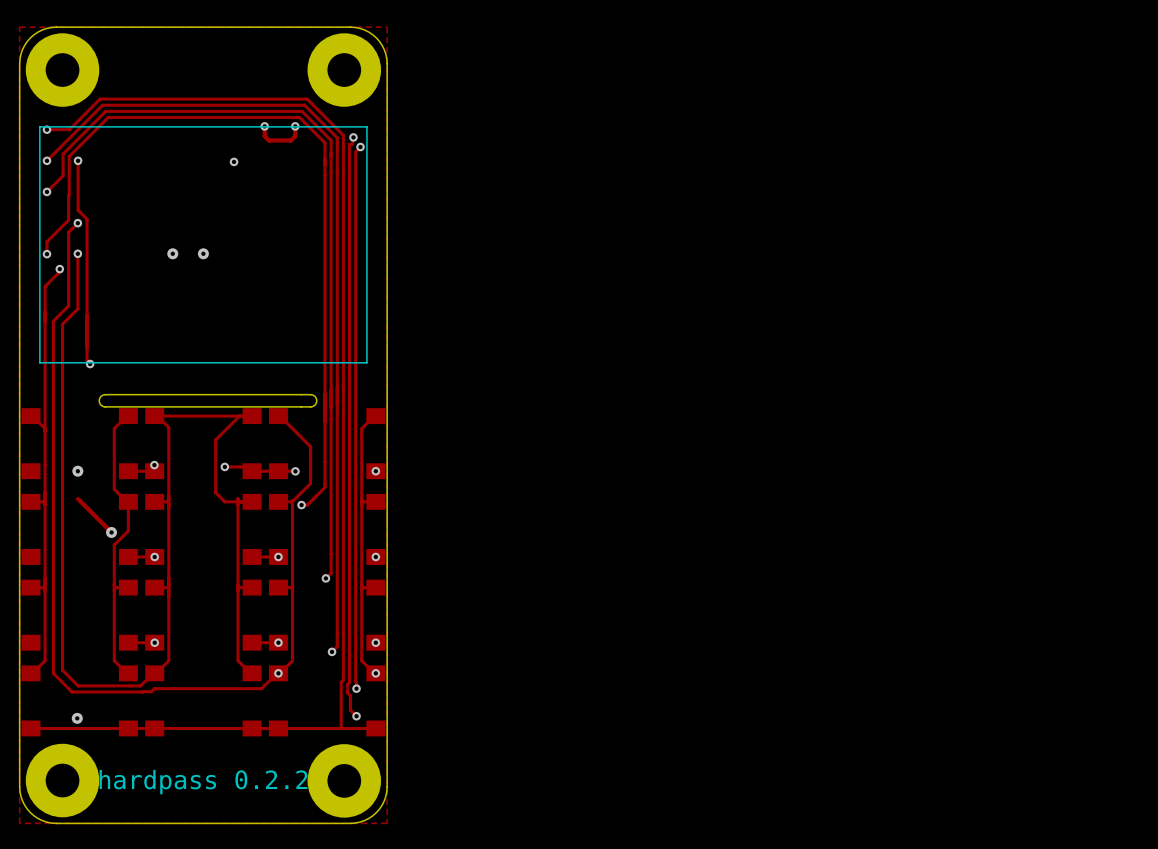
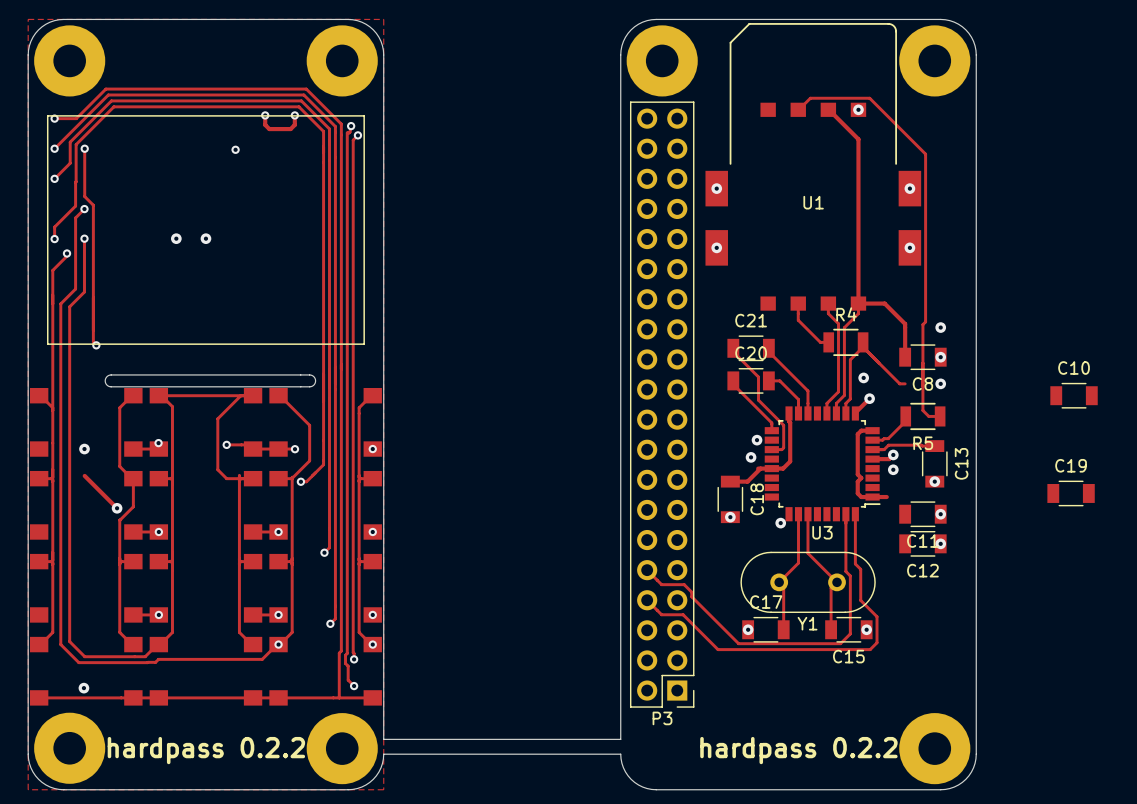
part: none -> (662, 60)
part: none -> (934, 60)
track: none -> (798, 109) (810, 98) (869, 98) (925, 154) (925, 321) (922, 324) (922, 410) (928, 416) (940, 416)
track: none -> (828, 109) (858, 139) (858, 303)
via: none -> (858, 109)
U1: none -> (813, 166)
via: none -> (716, 188)
via: none -> (909, 188)
via: none -> (716, 247)
via: none -> (909, 247)
track: none -> (798, 303) (798, 320) (820, 342) (828, 342)
track: none -> (828, 303) (828, 313) (838, 323) (838, 391) (826, 403) (826, 413)
track: none -> (858, 303) (884, 303) (905, 324) (905, 357)
track: none -> (858, 303) (858, 313) (844, 327) (844, 395) (836, 403) (836, 413)
via: none -> (940, 327)
R4: none -> (845, 342)
track: none -> (863, 347) (899, 383) (905, 383)
track: none -> (863, 347) (850, 359) (850, 398) (845, 403) (845, 413)
track: none -> (733, 348) (733, 351) (758, 377) (758, 400) (783, 425) (783, 447) (771, 449)
C21: none -> (751, 348)
track: none -> (768, 348) (768, 351) (807, 390) (807, 413)
C8: none -> (922, 357)
via: none -> (940, 357)
via: none -> (863, 377)
track: none -> (733, 380) (733, 384) (771, 422) (771, 430)
C20: none -> (751, 380)
track: none -> (768, 380) (779, 380) (798, 399) (798, 413)
via: none -> (940, 383)
C10: none -> (1074, 395)
track: none -> (869, 398) (855, 413)
via: none -> (869, 398)
P3: none -> (662, 404)
track: none -> (789, 413) (790, 461) (783, 468) (758, 468)
track: none -> (905, 416) (905, 421) (888, 438) (872, 440)
R5: none -> (922, 416)
track: none -> (872, 430) (861, 430) (857, 434) (857, 474) (861, 478) (857, 481) (857, 493) (861, 497) (886, 497)
via: none -> (757, 440)
track: none -> (934, 446) (888, 445) (884, 449) (872, 449)
track: none -> (893, 454) (889, 459) (872, 459)
via: none -> (893, 454)
via: none -> (751, 457)
U3: none -> (822, 463)
C13: none -> (934, 463)
track: none -> (760, 468) (747, 481) (730, 481)
via: none -> (893, 469)
via: none -> (934, 481)
C19: none -> (1071, 493)
C18: none -> (730, 499)
track: none -> (798, 514) (798, 563) (779, 582) (783, 586) (783, 629)
track: none -> (807, 514) (807, 553) (837, 582) (831, 588) (831, 629)
track: none -> (845, 514) (845, 571) (850, 575) (850, 633) (840, 643) (738, 643) (691, 596) (691, 592) (684, 584) (661, 584) (647, 570)
track: none -> (855, 514) (855, 563) (860, 569) (860, 600) (877, 616) (877, 642) (870, 649) (718, 649) (683, 614) (661, 614) (647, 600)
C11: none -> (922, 514)
via: none -> (940, 514)
via: none -> (730, 517)
via: none -> (780, 523)
C12: none -> (922, 543)
via: none -> (940, 543)
Y1: none -> (808, 582)
via: none -> (748, 629)
C17: none -> (765, 629)
C15: none -> (848, 629)
via: none -> (866, 629)
board edge: (387, 771) (387, 786) -> (383, 739) (620, 739) (620, 54) (621, 45) (628, 33) (638, 24) (656, 19) (940, 19) (949, 20) (962, 26) (973, 41) (976, 54) (976, 754) (973, 767) (968, 775) (954, 787) (940, 789) (656, 789) (642, 787) (631, 779) (623, 767) (620, 754) (383, 754)
part: none -> (934, 748)
text: none -> hardpass 0.2.2 (798, 750)

